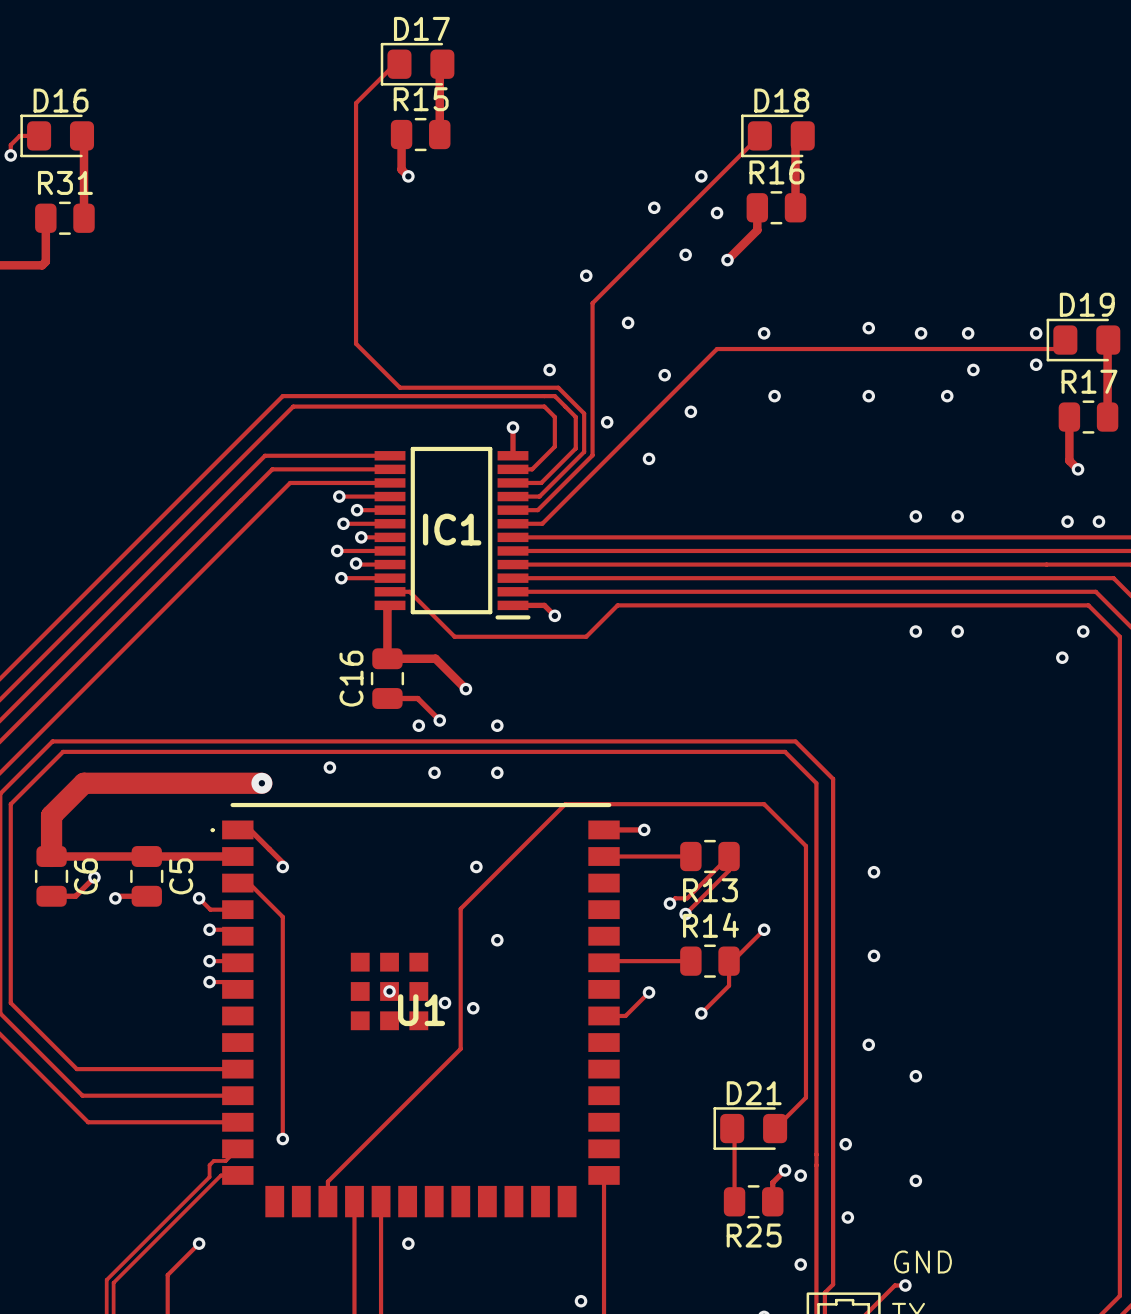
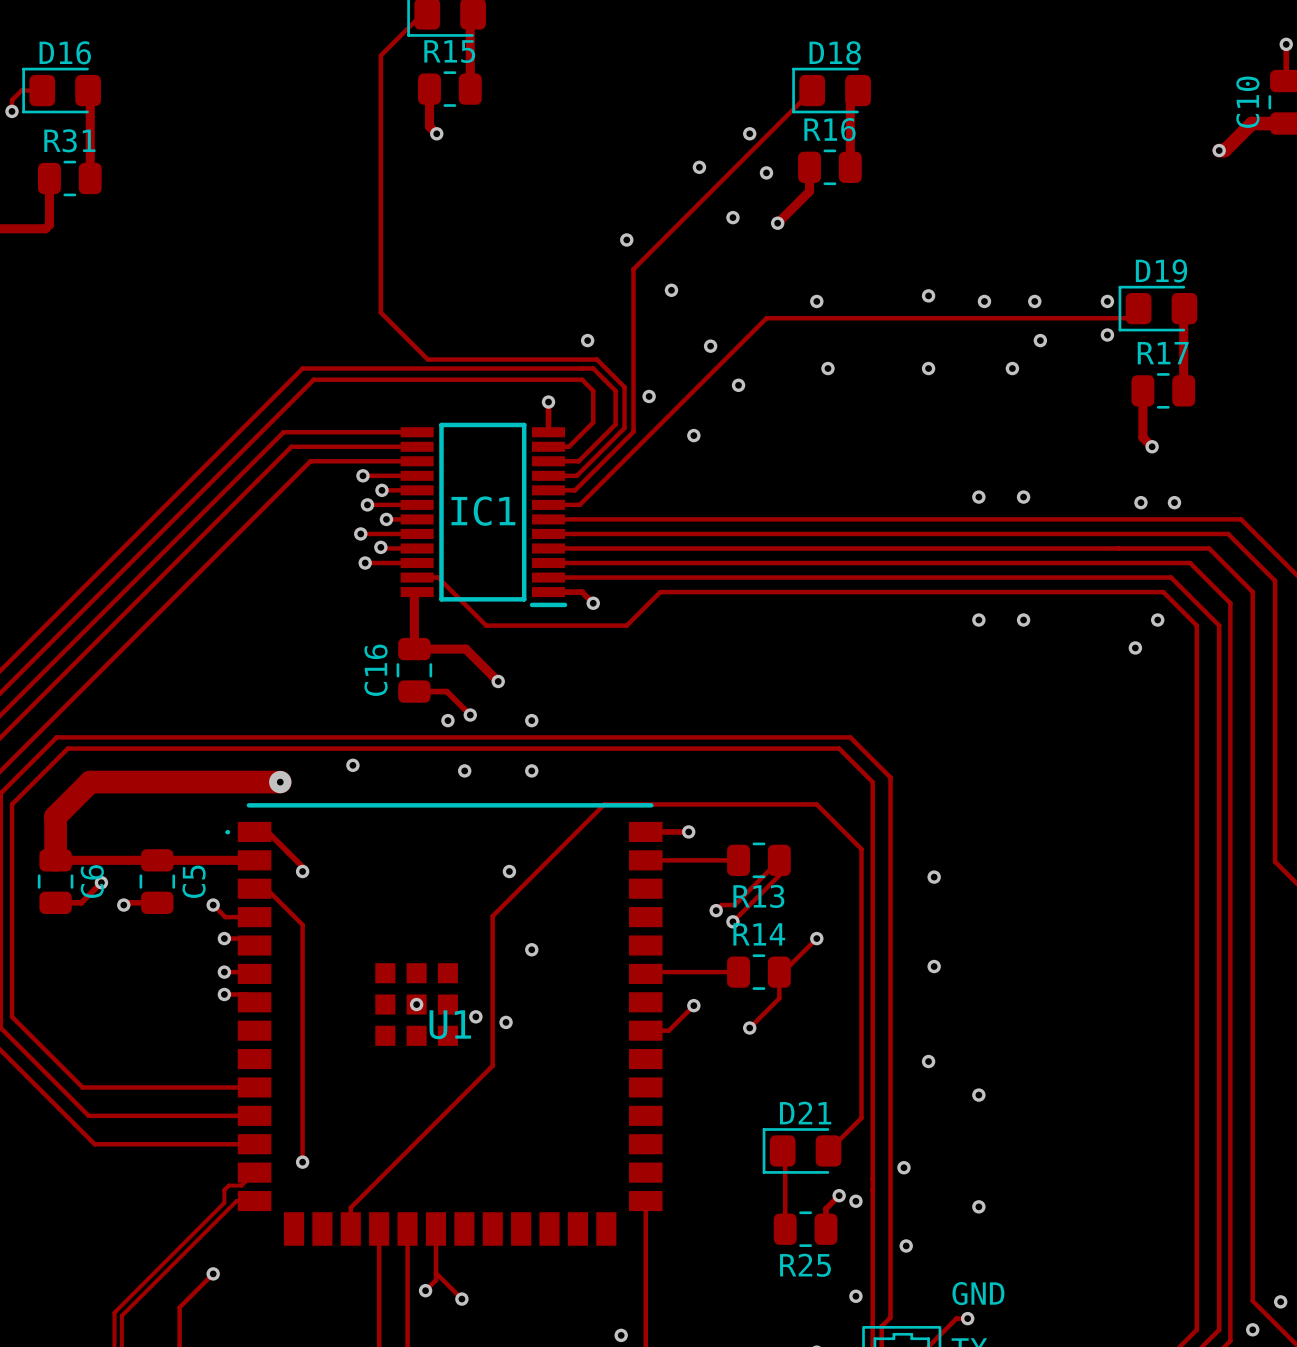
track: none -> (435, 1228) (435, 1280) (425, 1290)
track: none -> (435, 1273) (461, 1299)
via: (408, 1243) -> none
via: none -> (425, 1290)
via: none -> (461, 1299)

